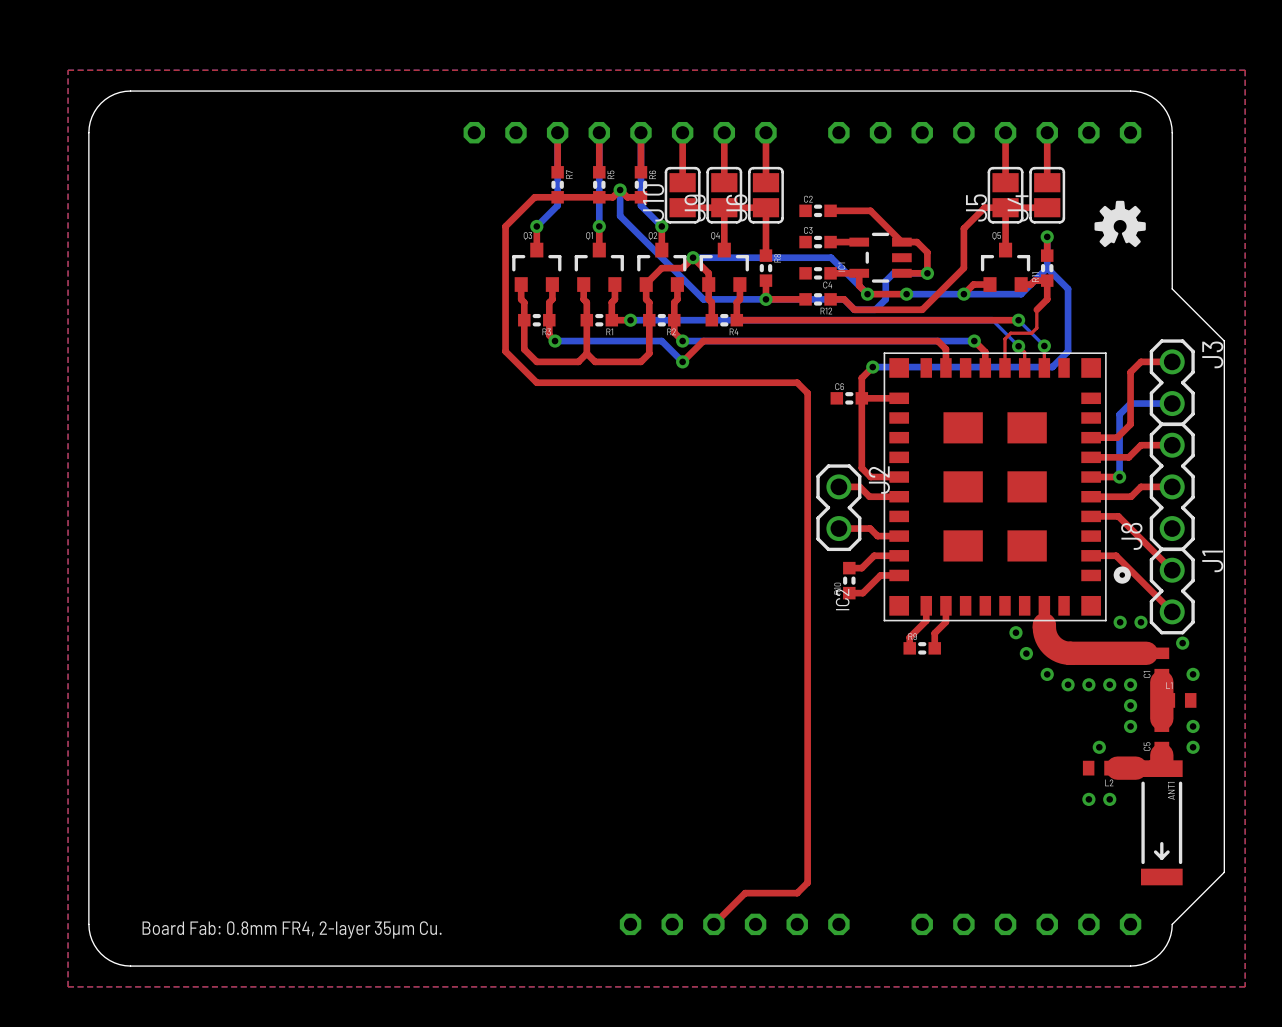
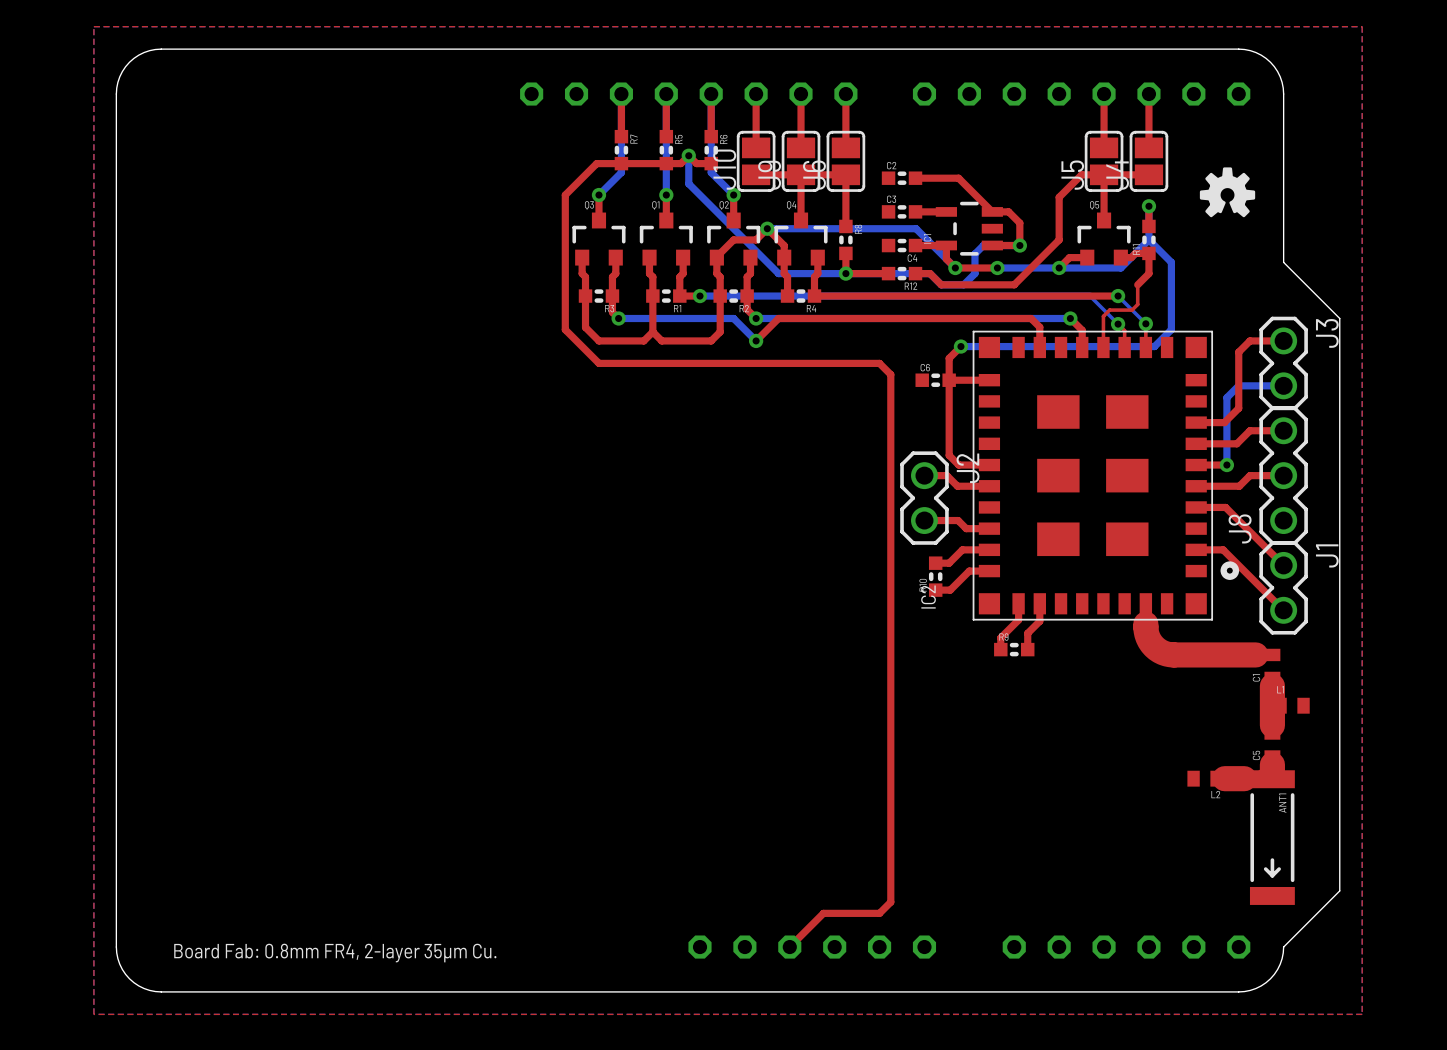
via: (1120, 622) -> none
via: (1140, 622) -> none
via: (1015, 632) -> none
via: (1182, 643) -> none
via: (1026, 653) -> none
via: (1047, 674) -> none
via: (1193, 674) -> none
via: (1068, 684) -> none
via: (1088, 684) -> none
via: (1109, 684) -> none
via: (1130, 684) -> none
via: (1130, 705) -> none
via: (1130, 726) -> none
via: (1193, 726) -> none
via: (1099, 747) -> none
via: (1193, 747) -> none
via: (1088, 799) -> none
via: (1109, 799) -> none

